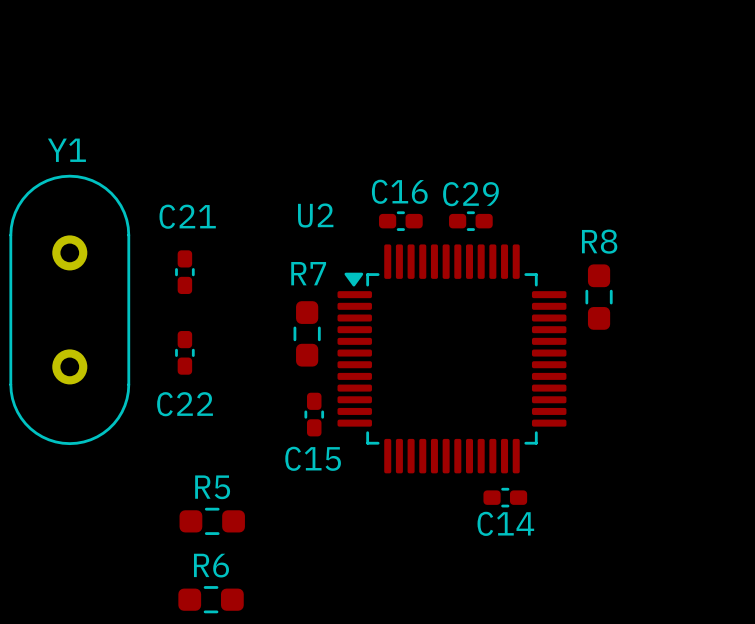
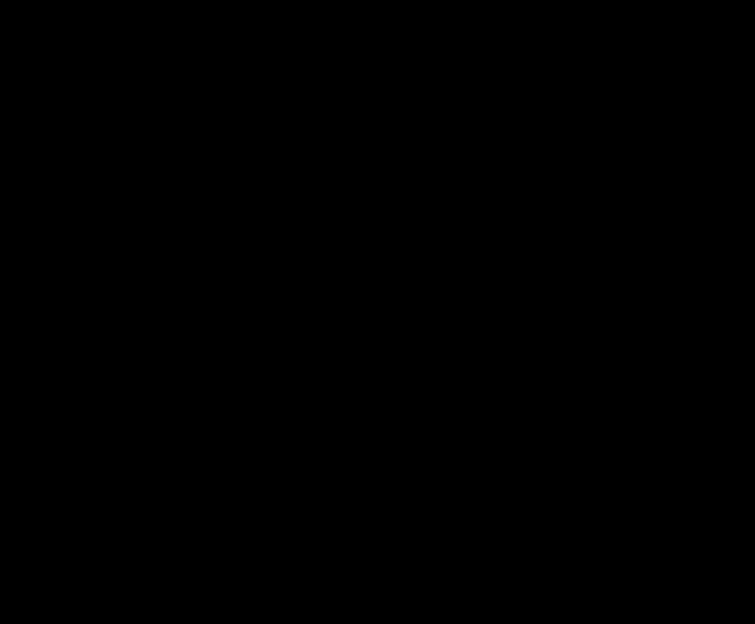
C16: (400, 221) -> none
C29: (470, 221) -> none
C21: (184, 272) -> none
R8: (599, 297) -> none
Y1: (69, 309) -> none
R7: (307, 333) -> none
C22: (184, 352) -> none
U2: (451, 358) -> none
C15: (314, 414) -> none
C14: (505, 497) -> none
R5: (212, 521) -> none
R6: (211, 599) -> none

